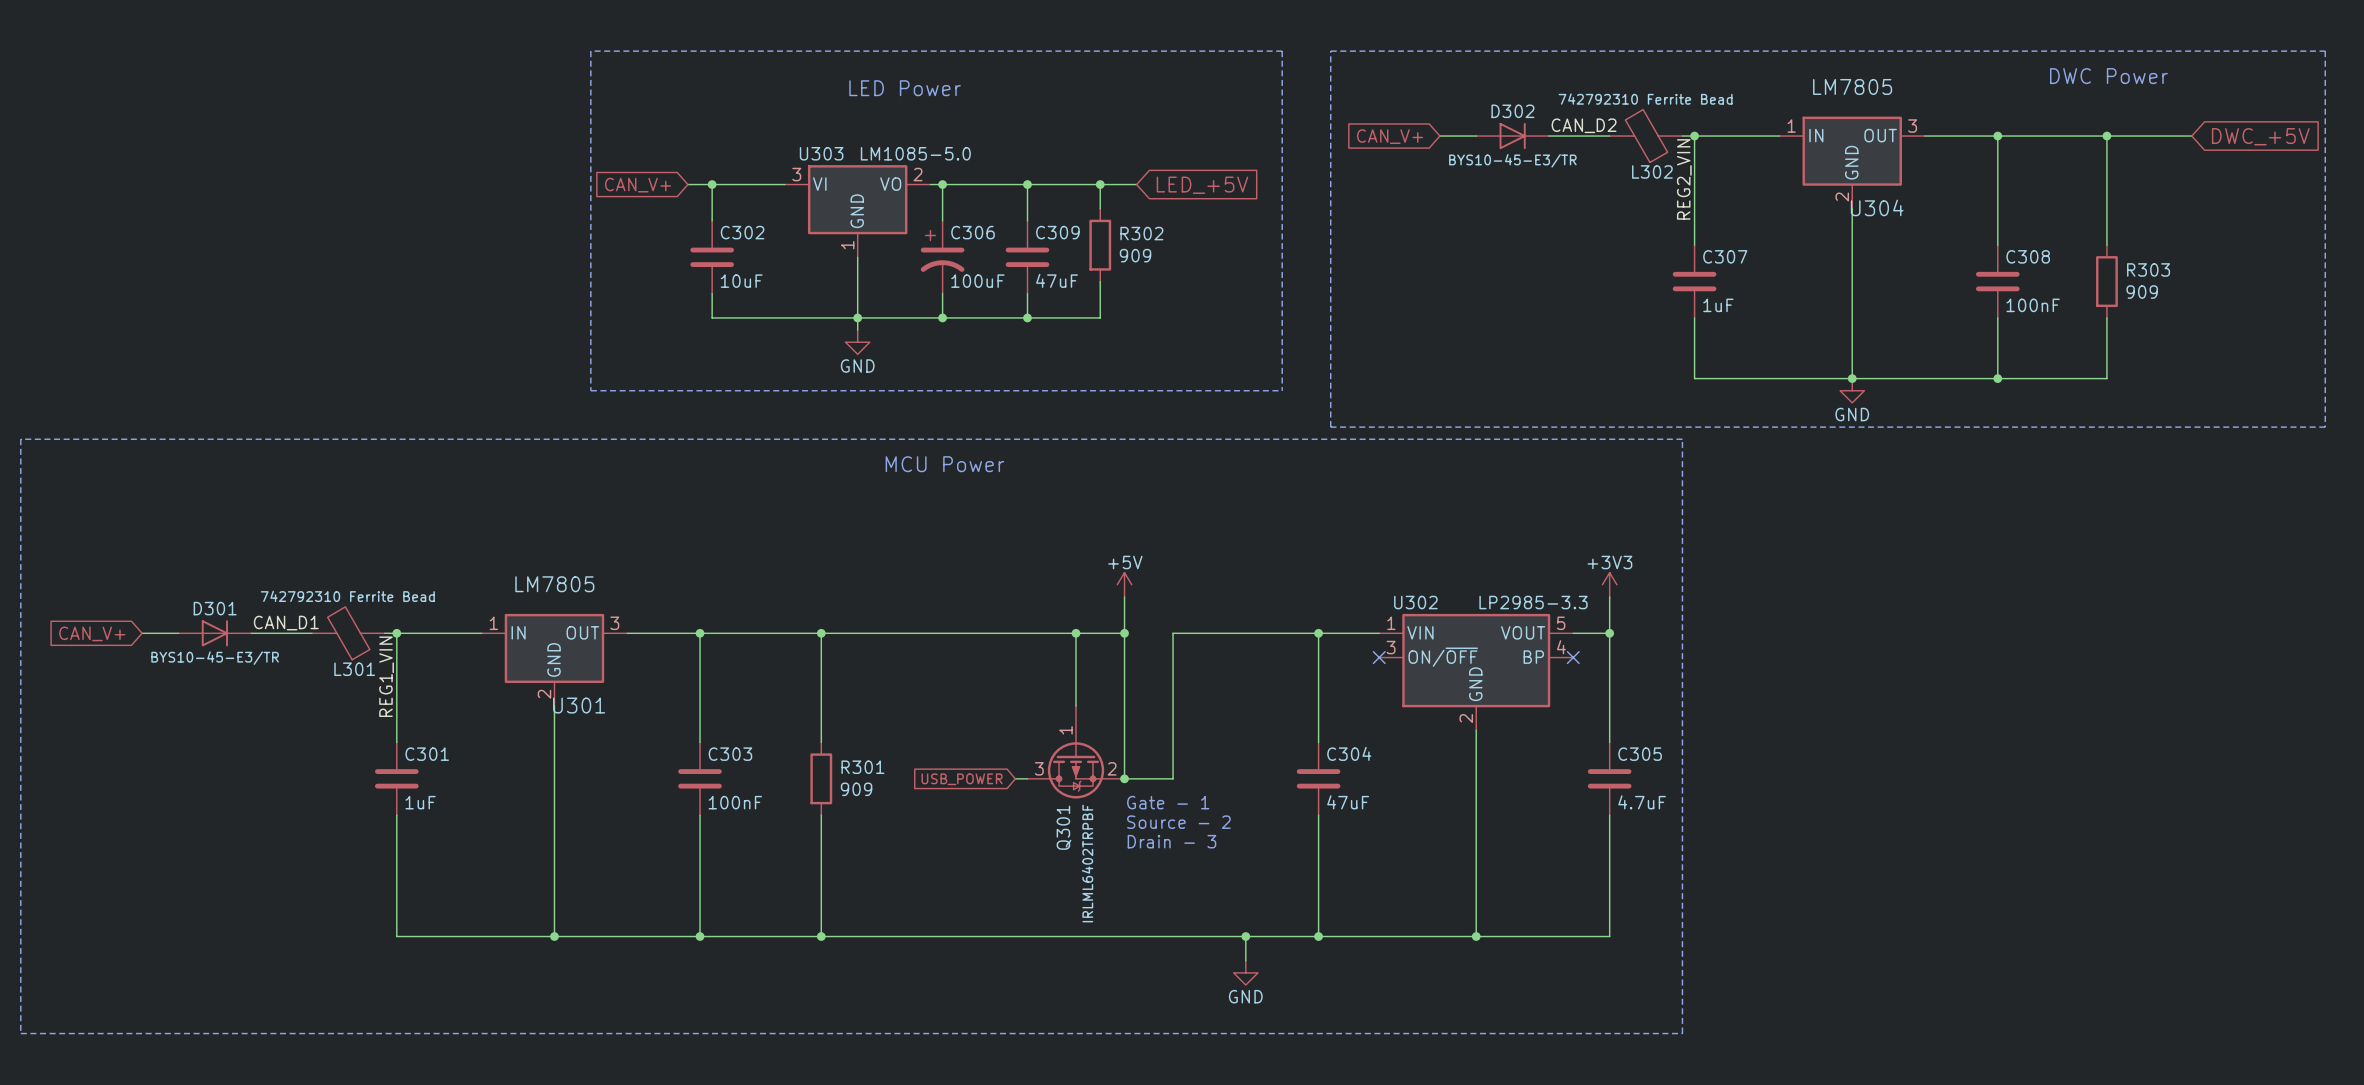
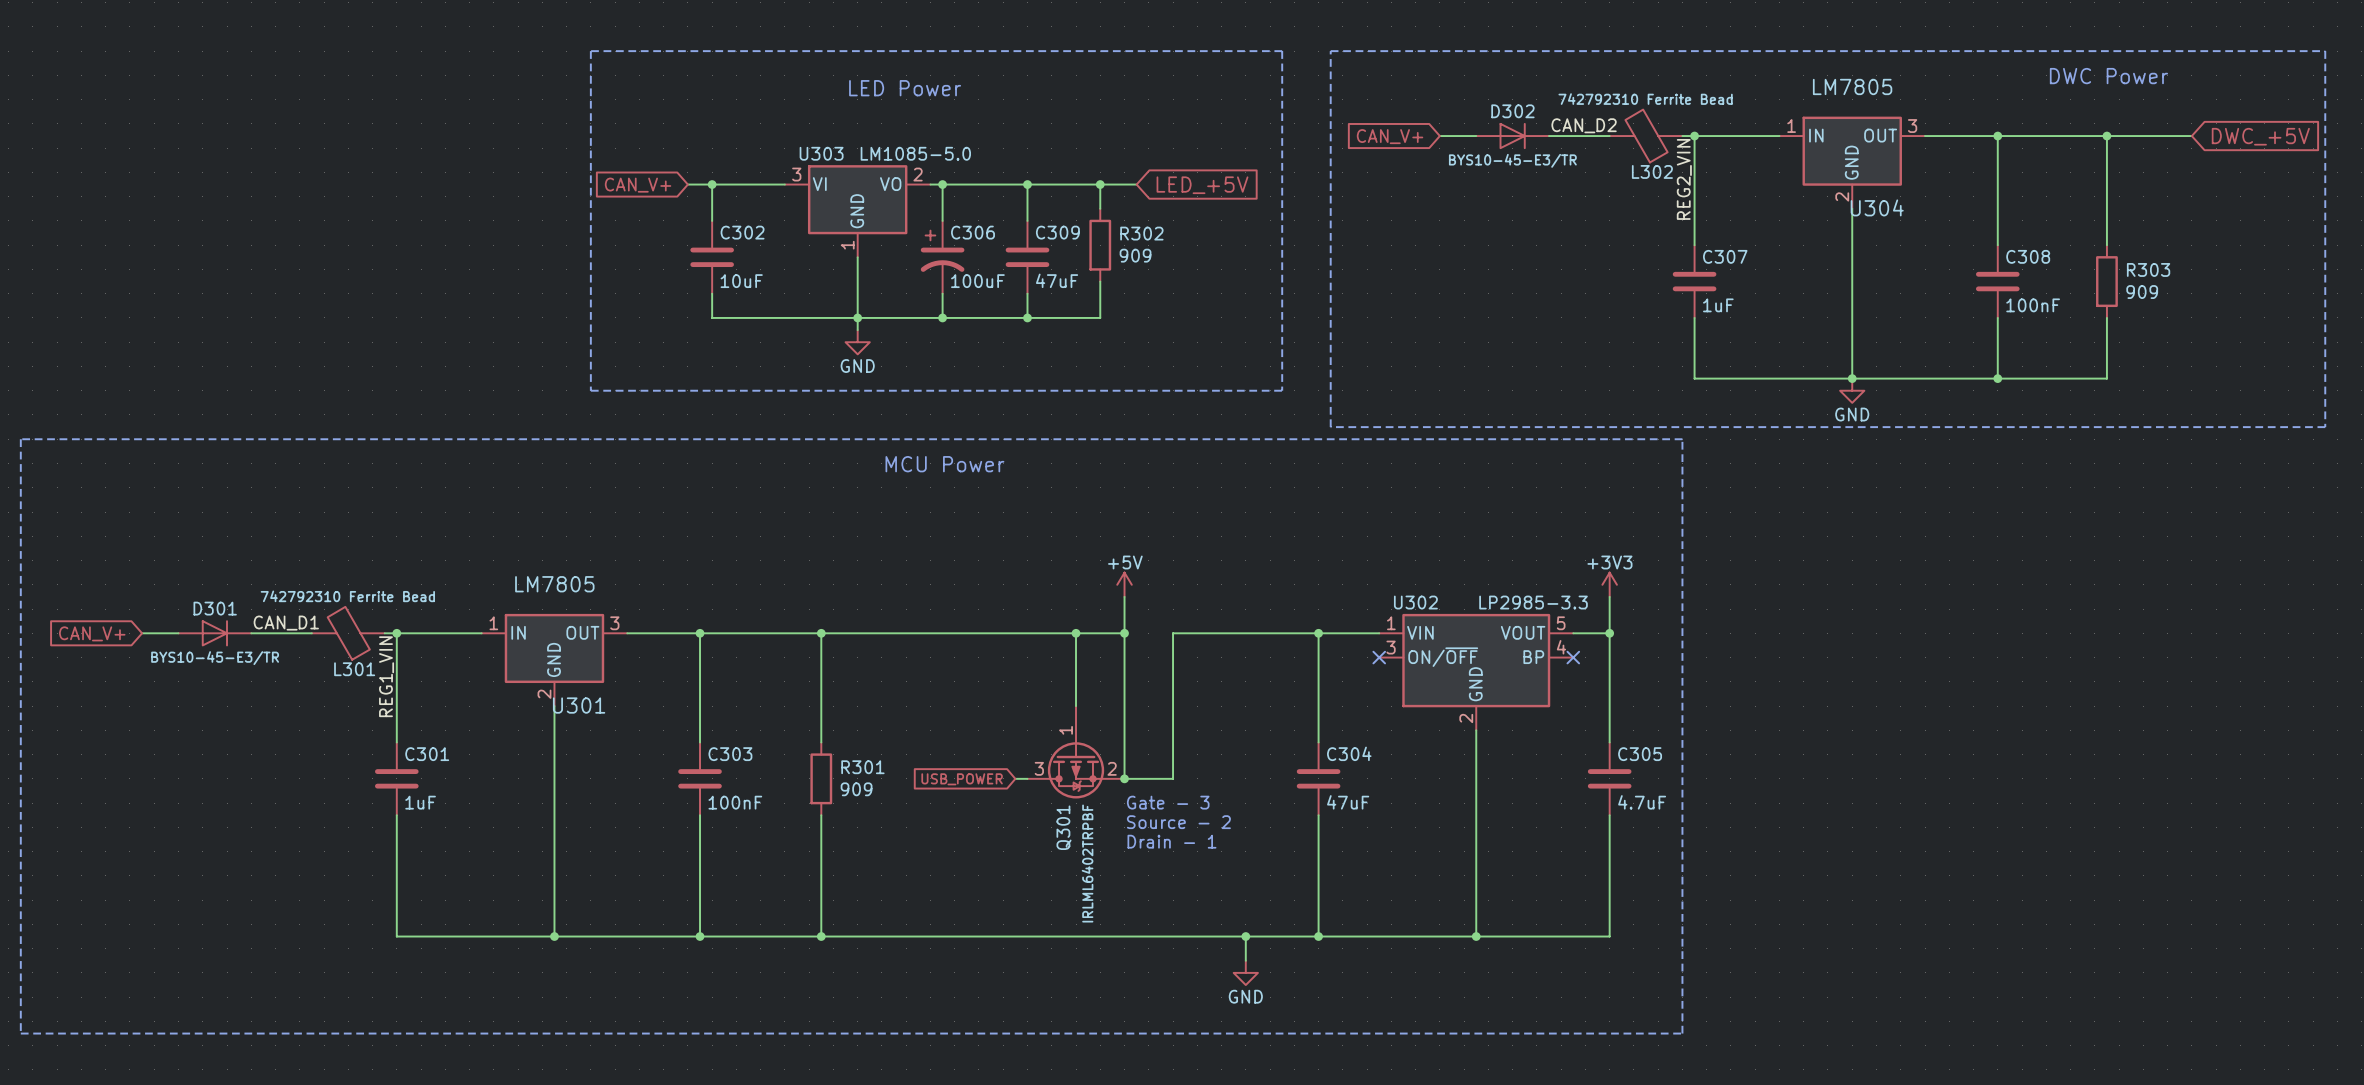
text: Gate - 1 (1168, 802) -> Gate - 3 (1168, 802)
text: Drain - 3 (1171, 841) -> Drain - 1 (1171, 841)

